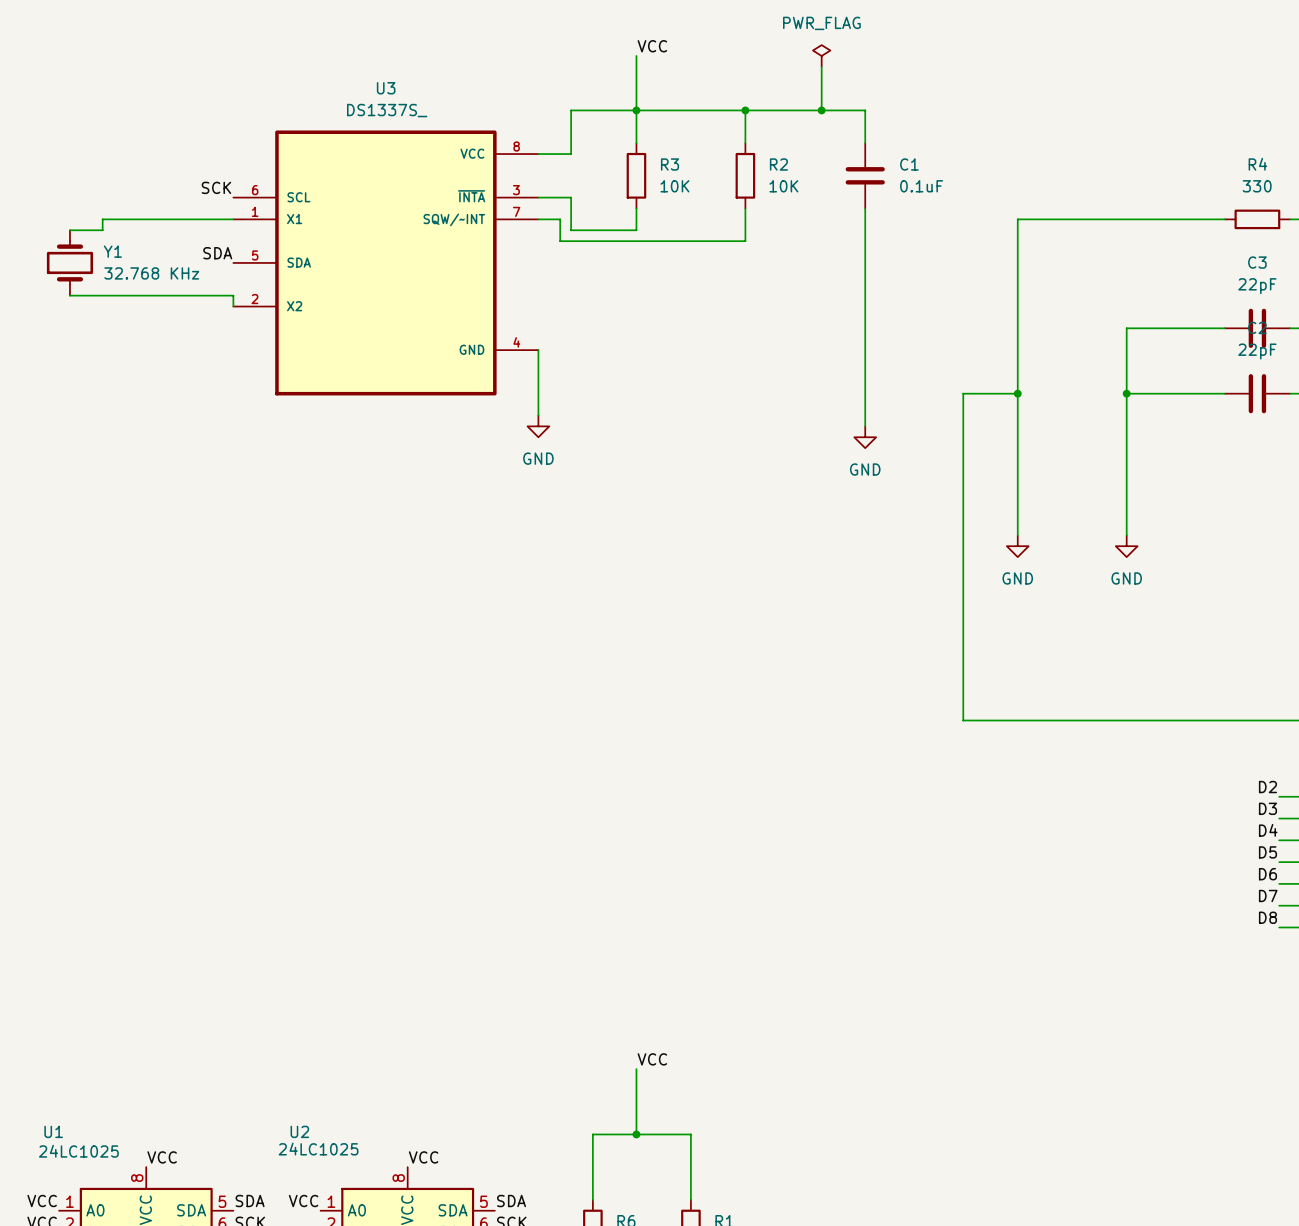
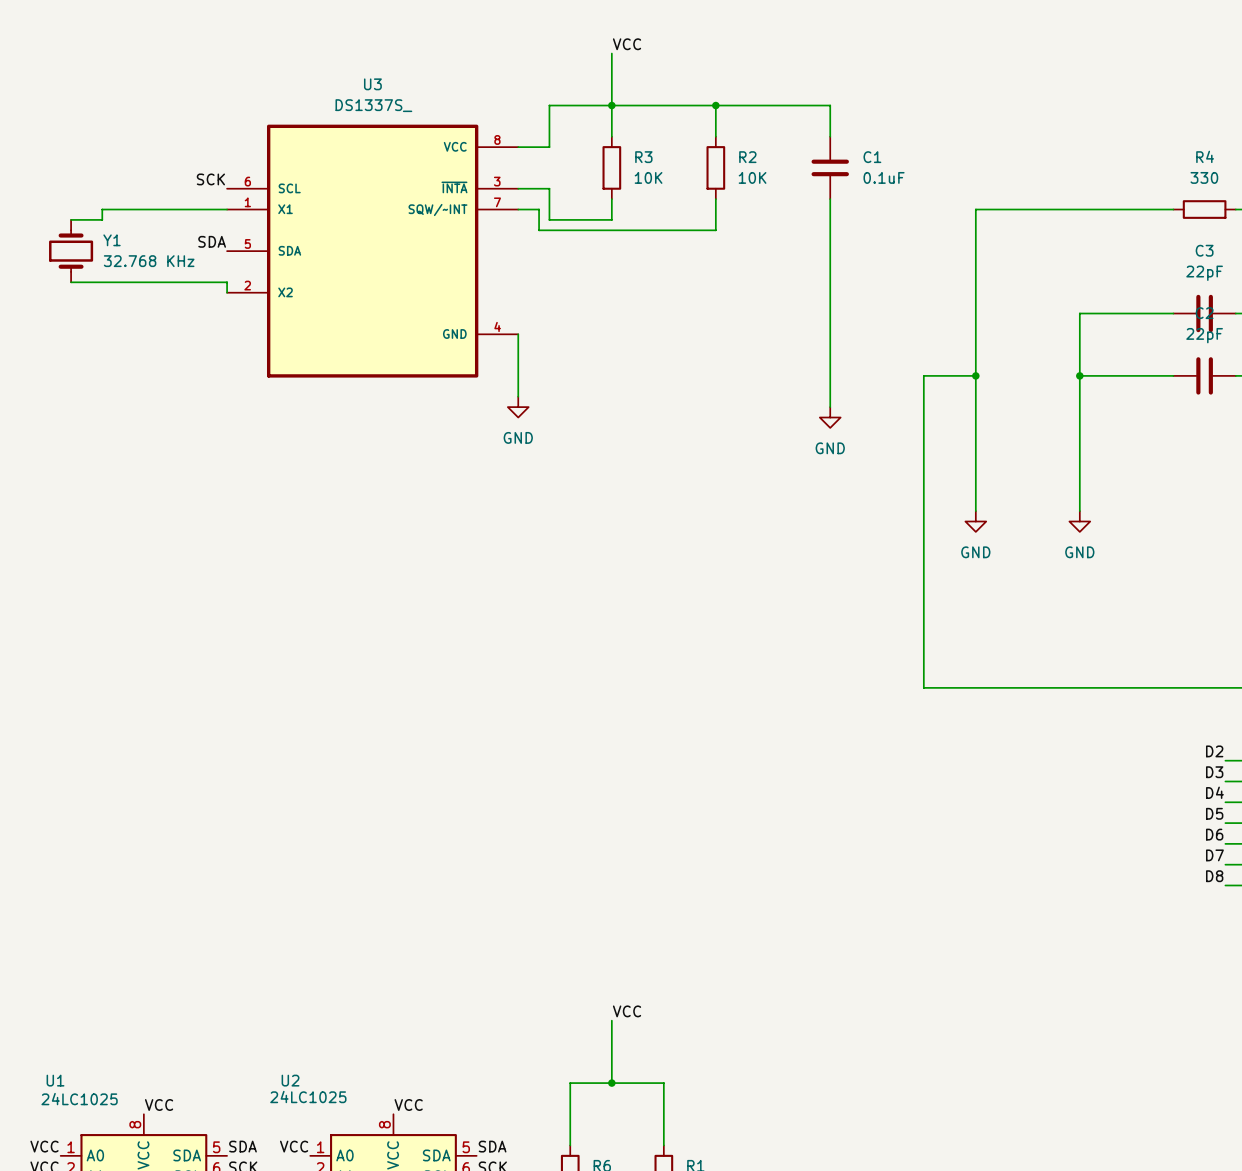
power symbol: PWR_FLAG (821, 55) -> none
wire: (821, 66) (821, 110) -> none
junction: (821, 110) -> none

